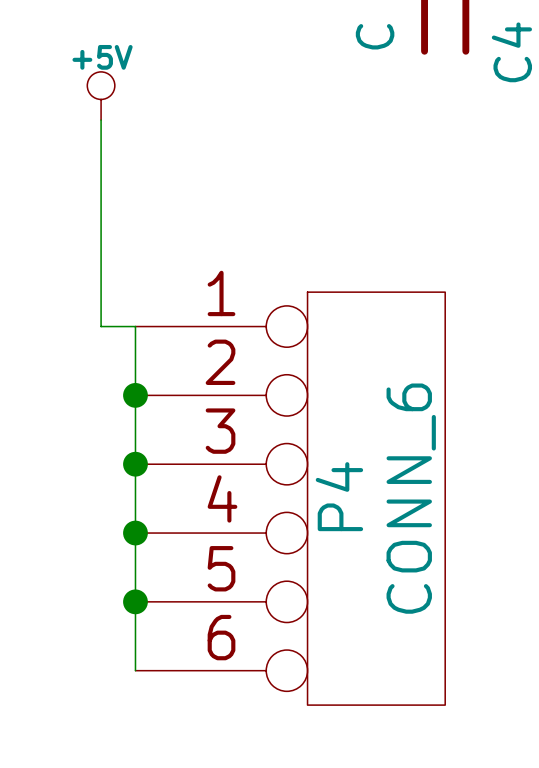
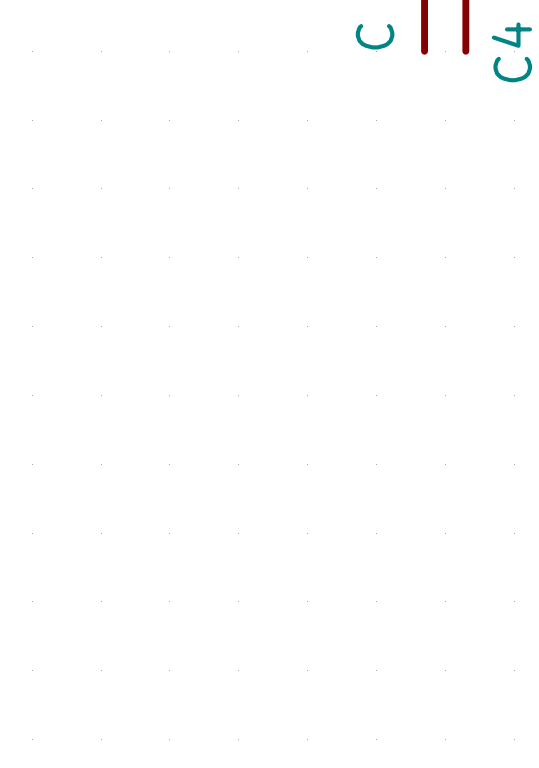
power symbol: +5V (101, 95) -> none
wire: (101, 120) (101, 326) (135, 326) (135, 670) -> none
junction: (135, 395) -> none
junction: (135, 464) -> none
P4: CONN_6 (290, 498) -> none
junction: (135, 533) -> none
junction: (135, 601) -> none

